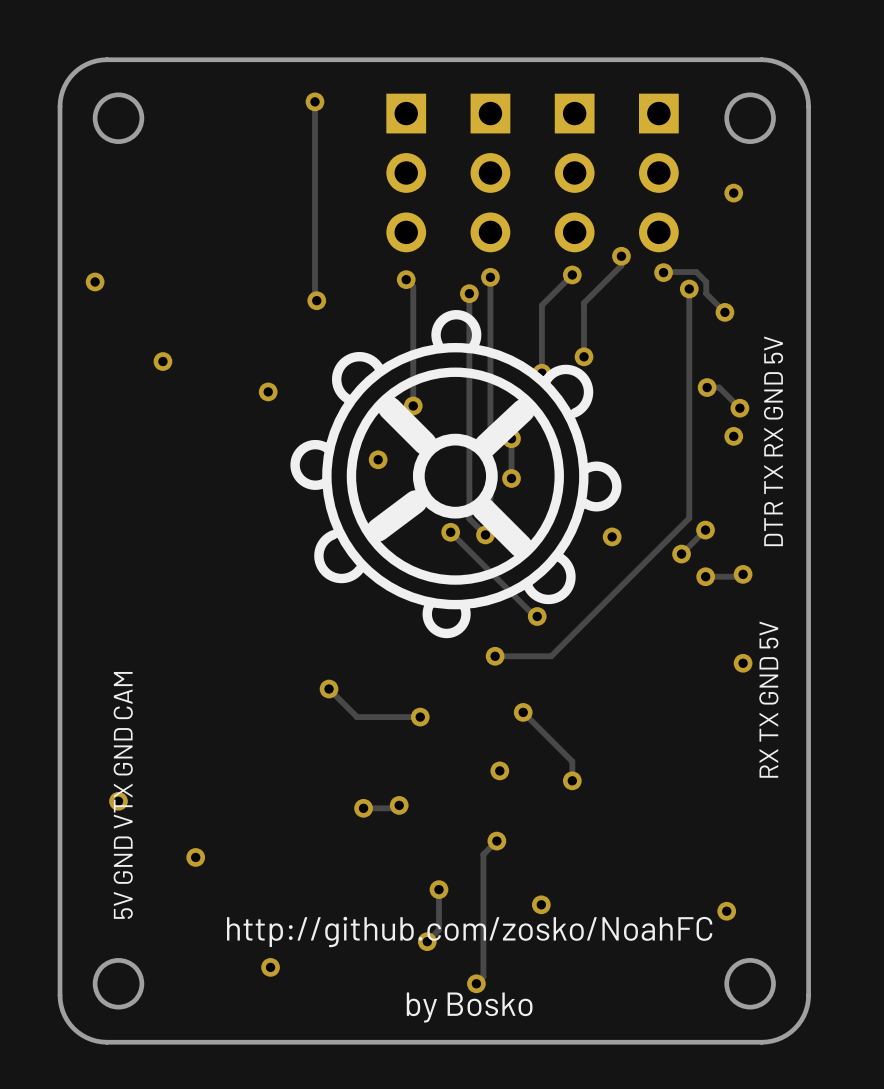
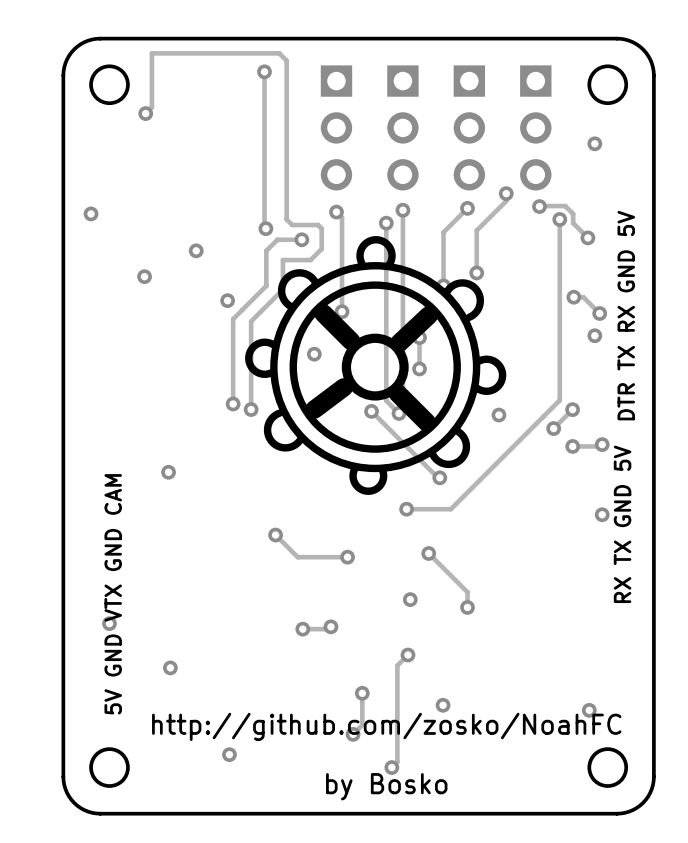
track: none -> (145, 113) (151, 107) (151, 53) (279, 53) (286, 60) (286, 219) (292, 225) (318, 225) (321, 228) (321, 248) (310, 260) (282, 260) (282, 289) (251, 321) (251, 409)
via: none -> (145, 113)
track: none -> (301, 239) (277, 239) (266, 250) (266, 285) (233, 319) (233, 404)
via: none -> (301, 239)
via: none -> (196, 250)
via: none -> (233, 404)
via: none -> (251, 409)
via: none -> (168, 472)

